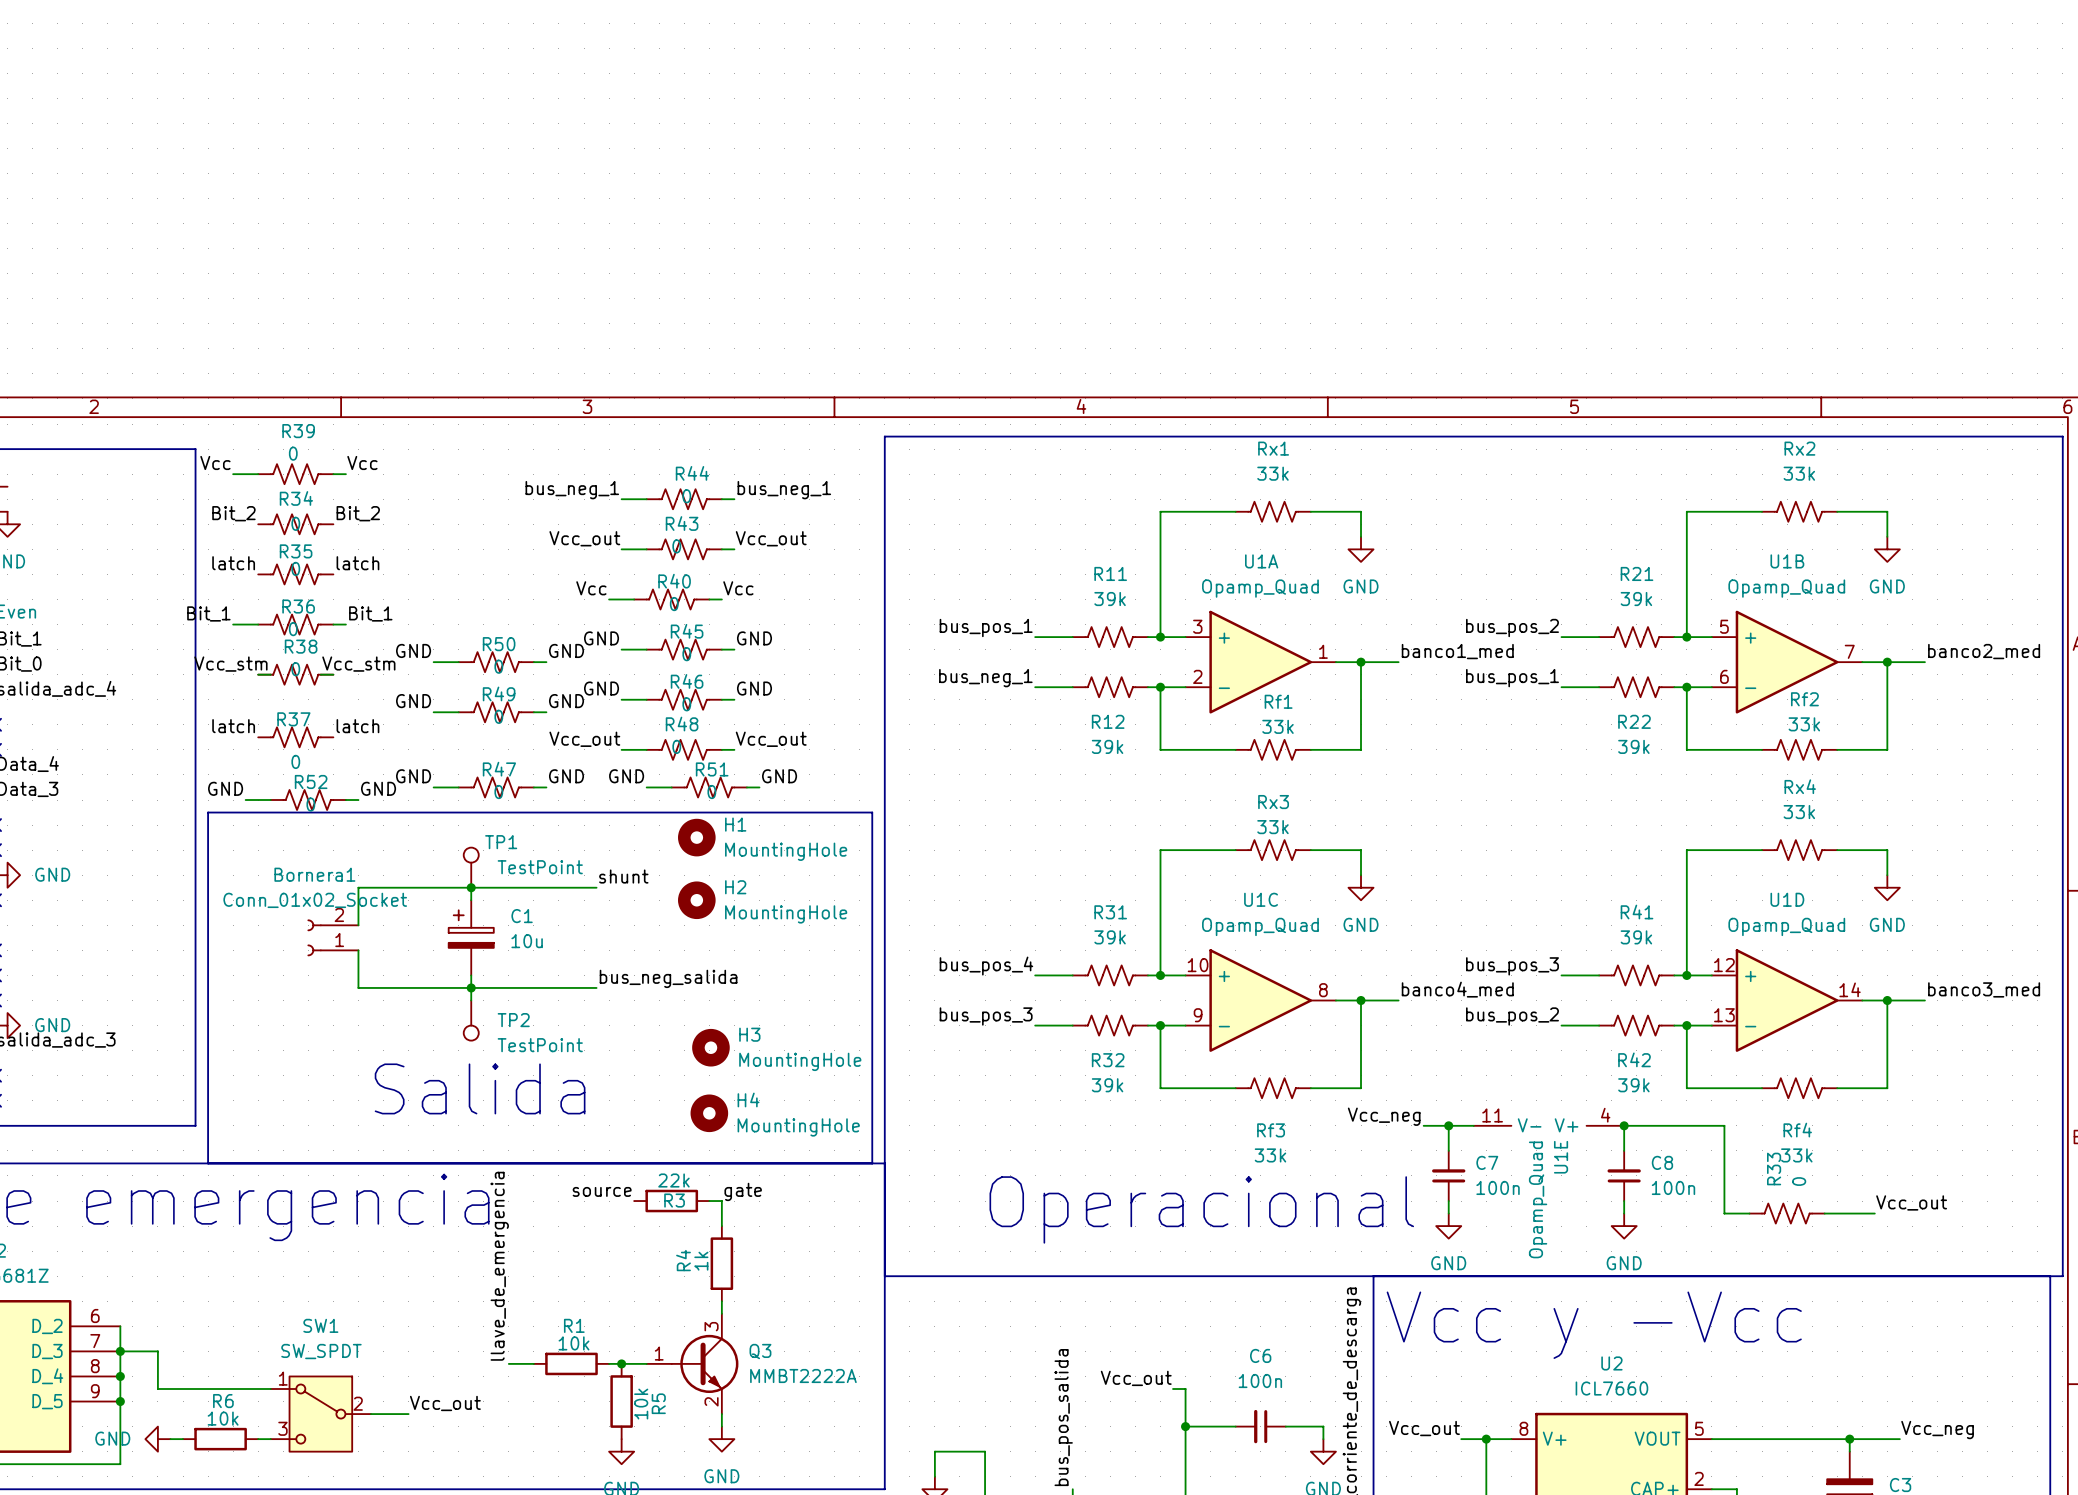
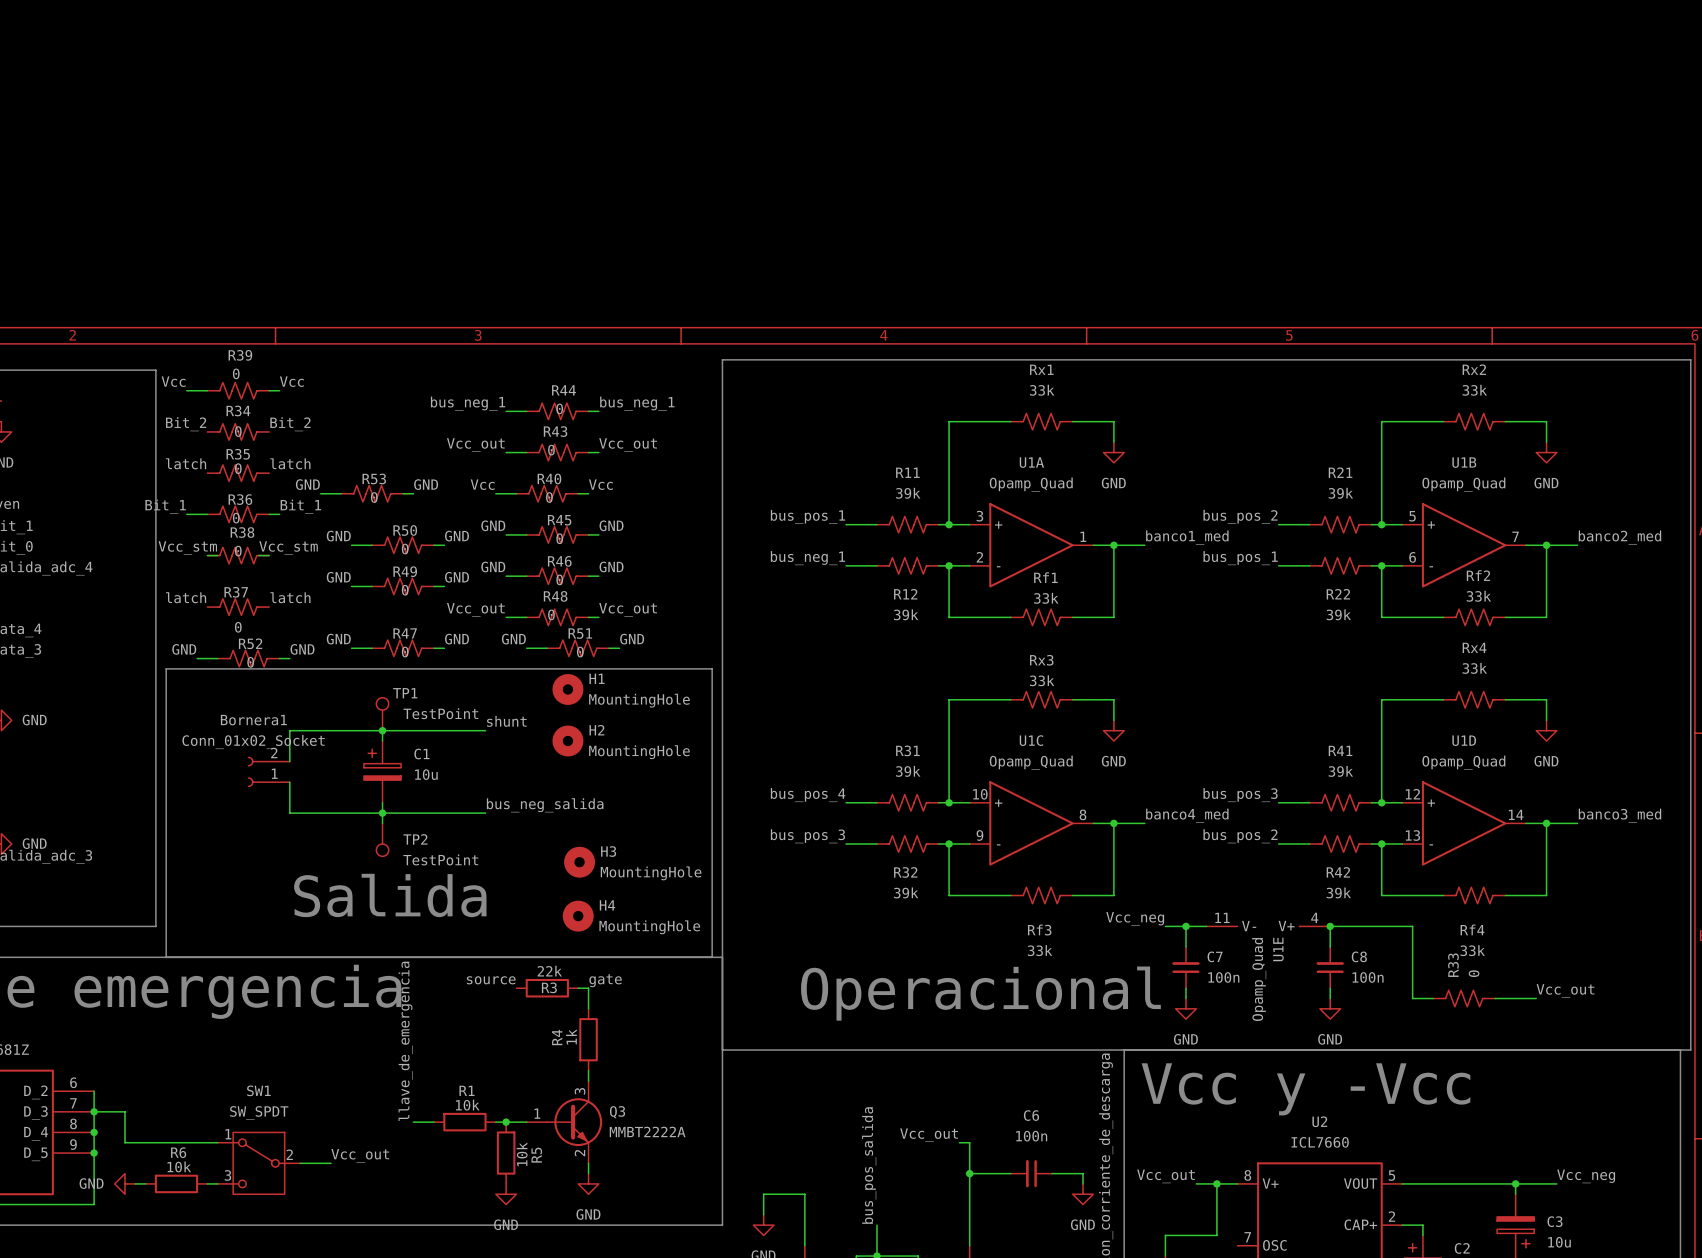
label: none -> GND (307, 484)
label: none -> GND (426, 484)
wire: none -> (320, 493) (341, 493)
R53: none -> 0 (372, 493)
wire: none -> (403, 493) (413, 493)

